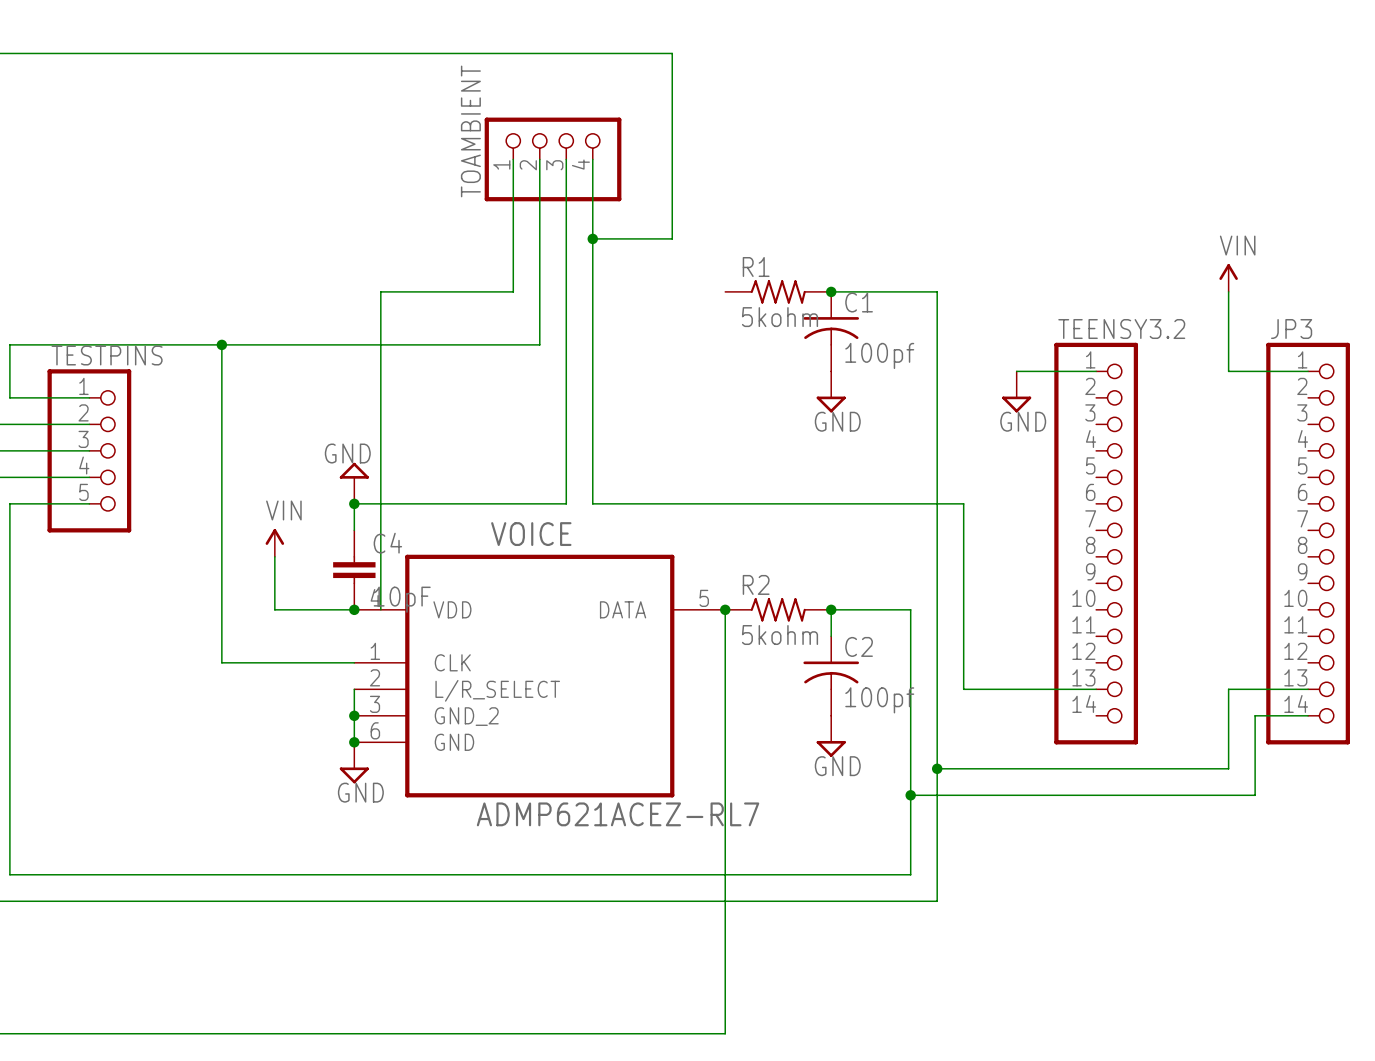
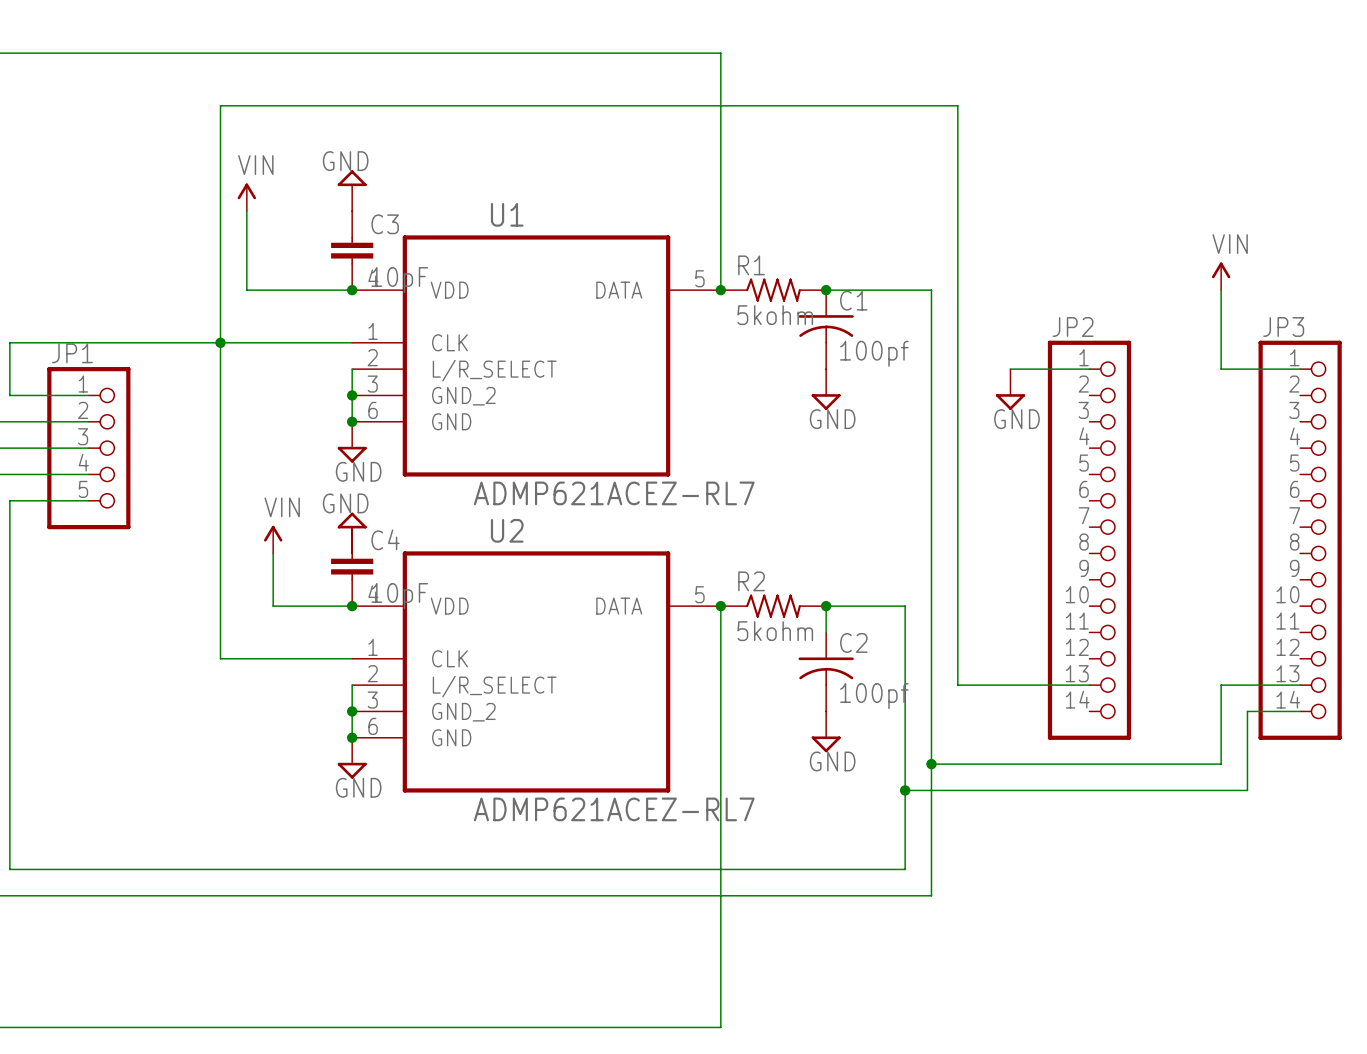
wire: (672, 53) (672, 238) (592, 238) -> (668, 53) (720, 53) (720, 290)
wire: (513, 159) (513, 291) (380, 291) (380, 609) -> none
wire: (539, 159) (539, 344) (354, 344) -> none
TOAMBIENT: (553, 159) -> none
wire: (566, 159) (566, 503) (354, 503) (354, 530) -> none
wire: (592, 159) (592, 503) (963, 503) -> (220, 342) (220, 105) (957, 105) (957, 500)
power symbol: none -> GND (352, 190)
power symbol: none -> VIN (246, 197)
wire: none -> (246, 211) (246, 290) (352, 290)
junction: (592, 238) -> none
C3: none -> 10pF (352, 250)
junction: none -> (352, 290)
junction: none -> (720, 290)
TEENSY3.2 name: TEENSY3.2 (1121, 329) -> JP2 (1073, 327)
TESTPINS name: TESTPINS (107, 355) -> JP1 (72, 353)
U1: none -> ADMP621ACEZ-RL7 (536, 355)
wire: none -> (352, 369) (352, 421)
junction: none -> (352, 395)
junction: none -> (352, 421)
power symbol: none -> GND (352, 442)
power symbol: GND (354, 483) -> none
junction: (354, 503) -> none
VOICE name: VOICE (531, 534) -> U2 (507, 530)
power symbol: none -> GND (352, 533)

